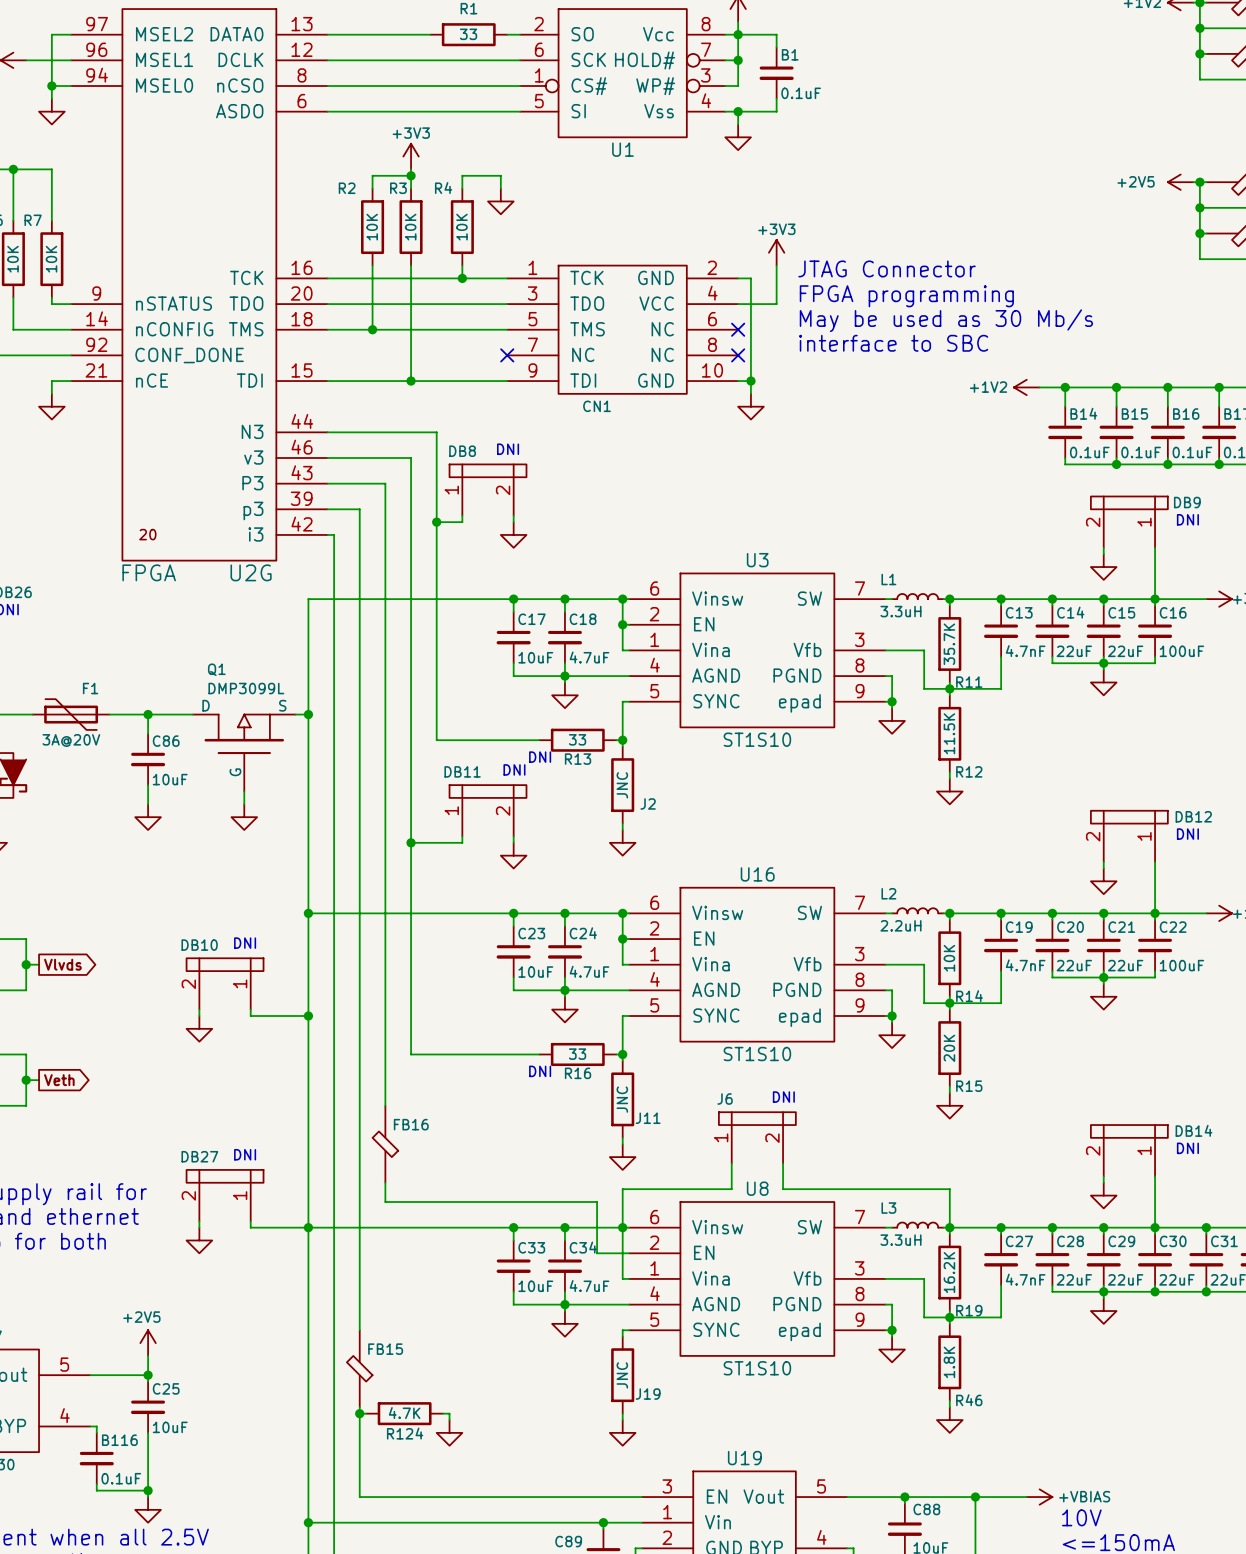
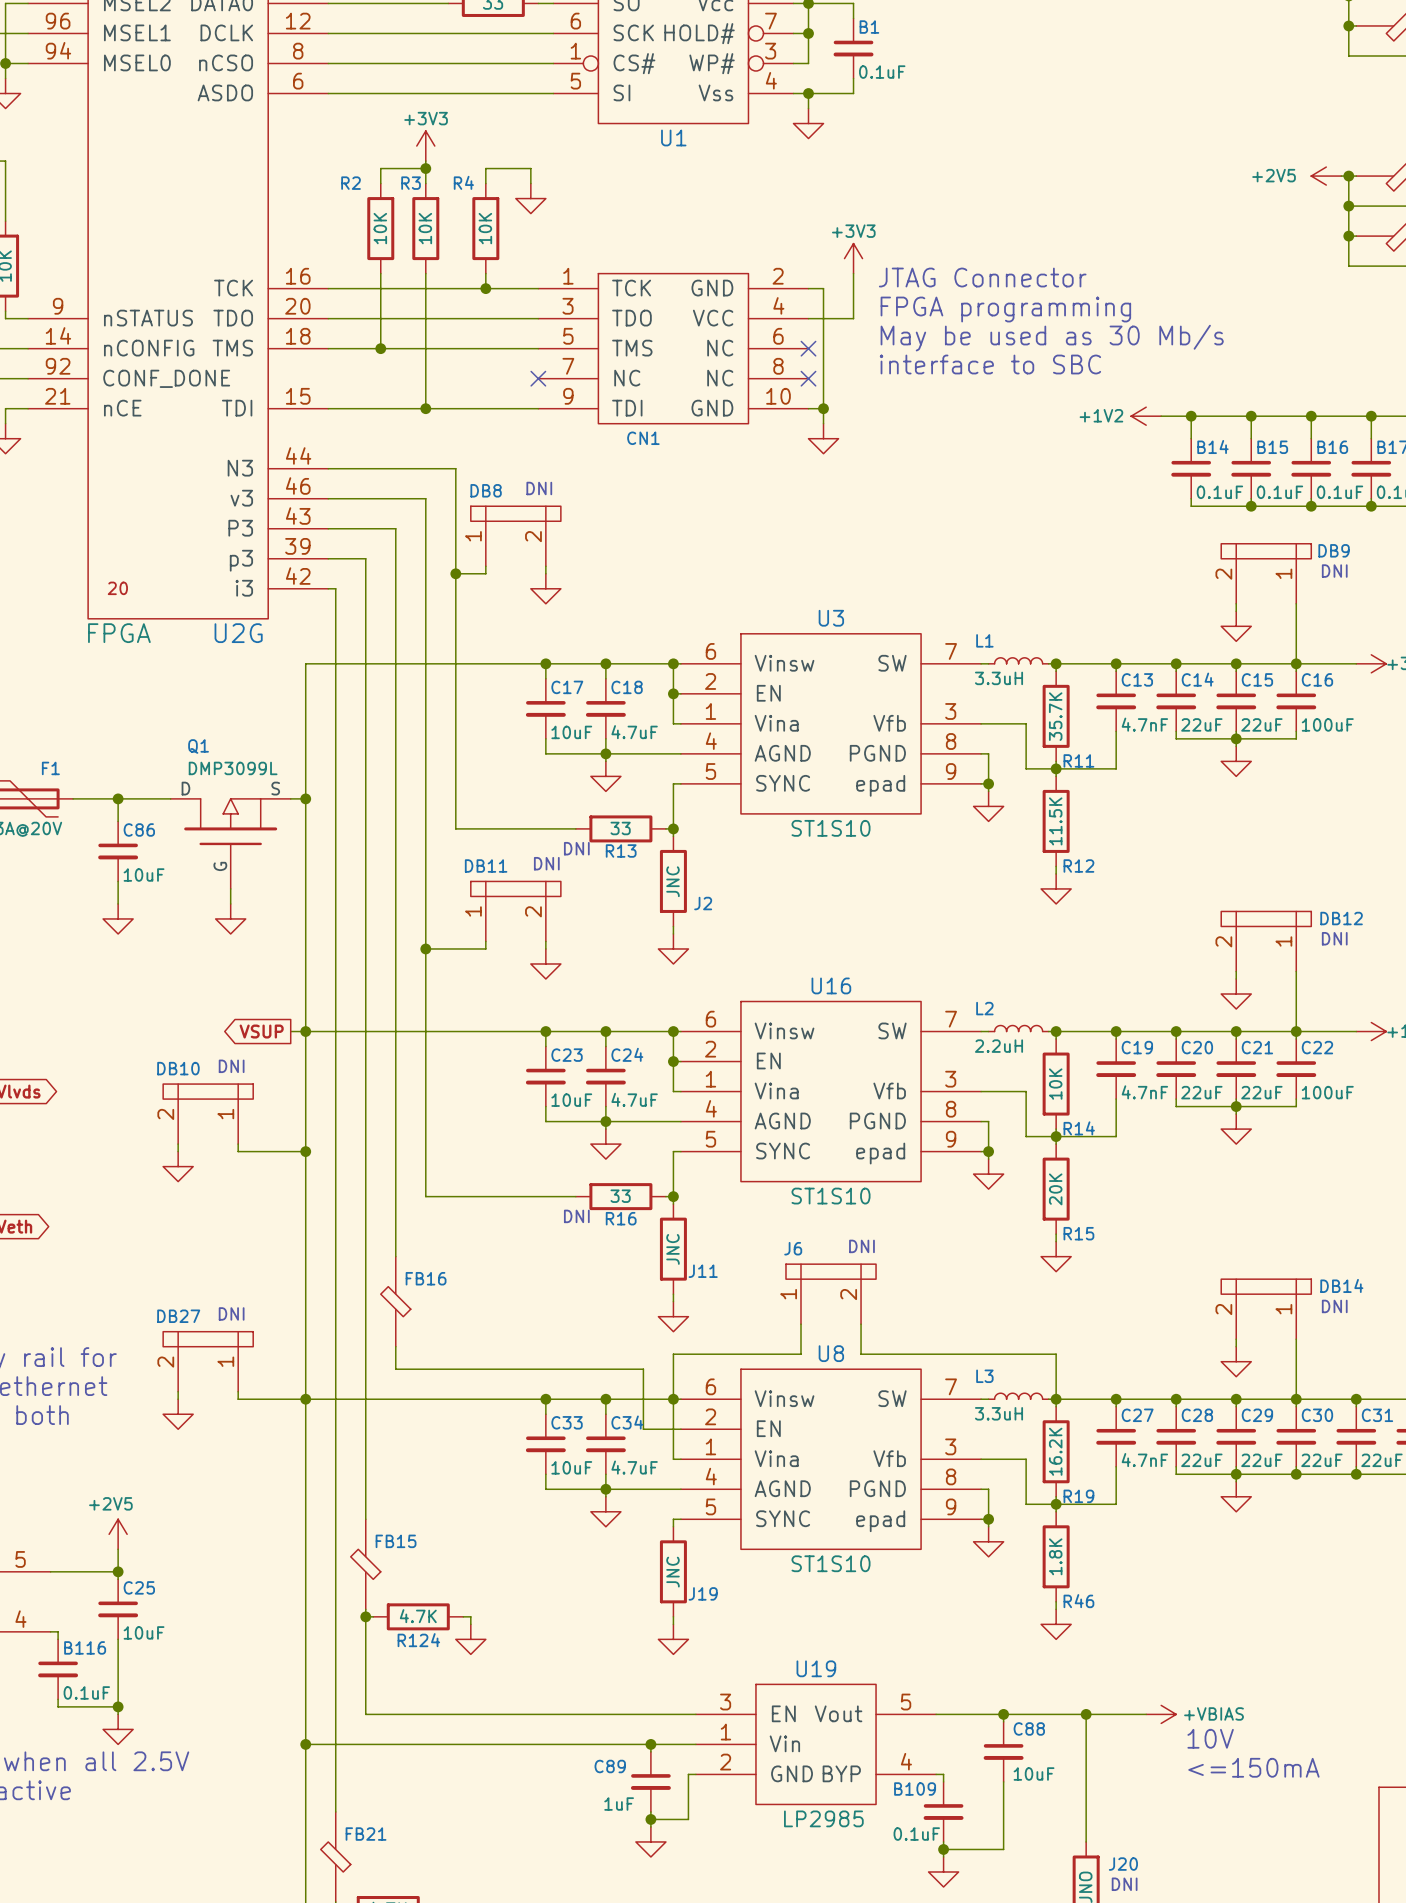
global label: none -> VSUP (261, 1031)
wire: none -> (290, 1031) (305, 1031)

